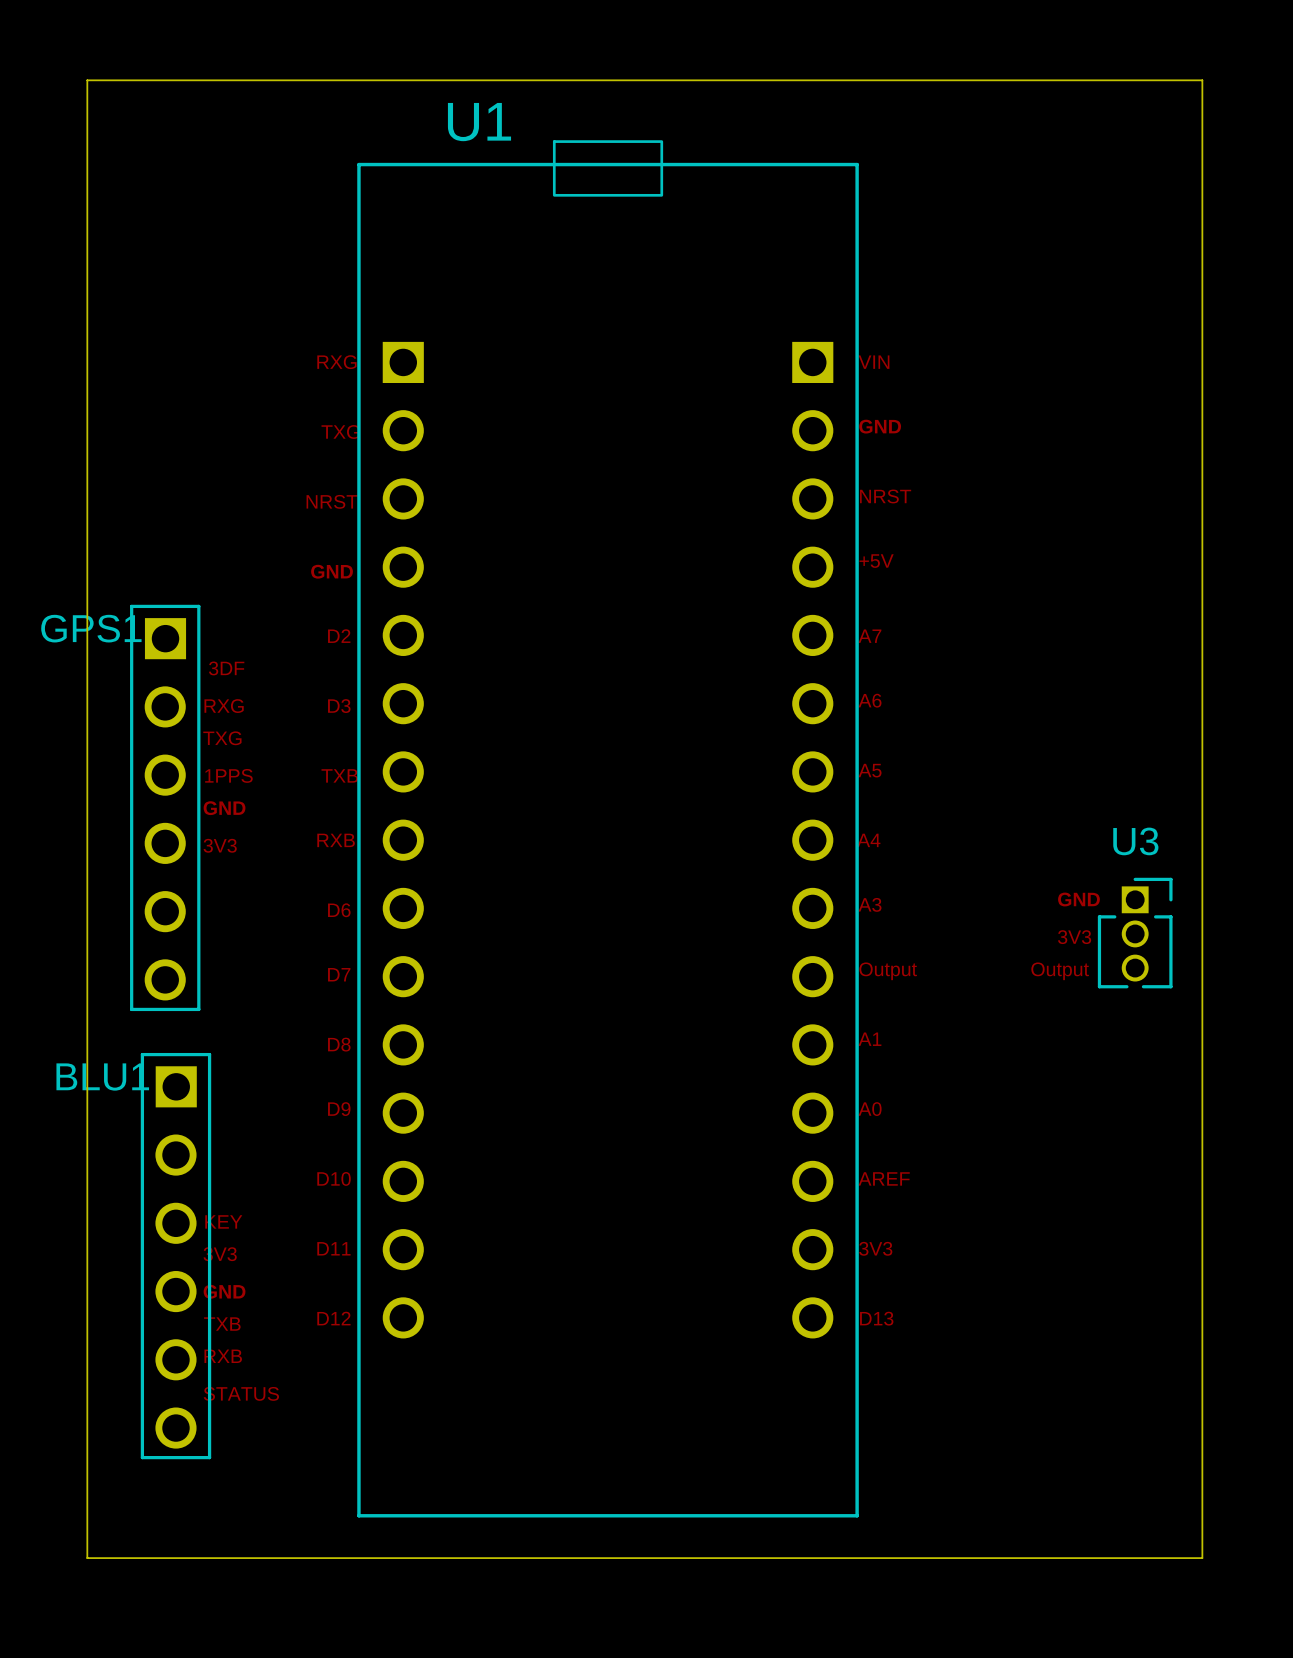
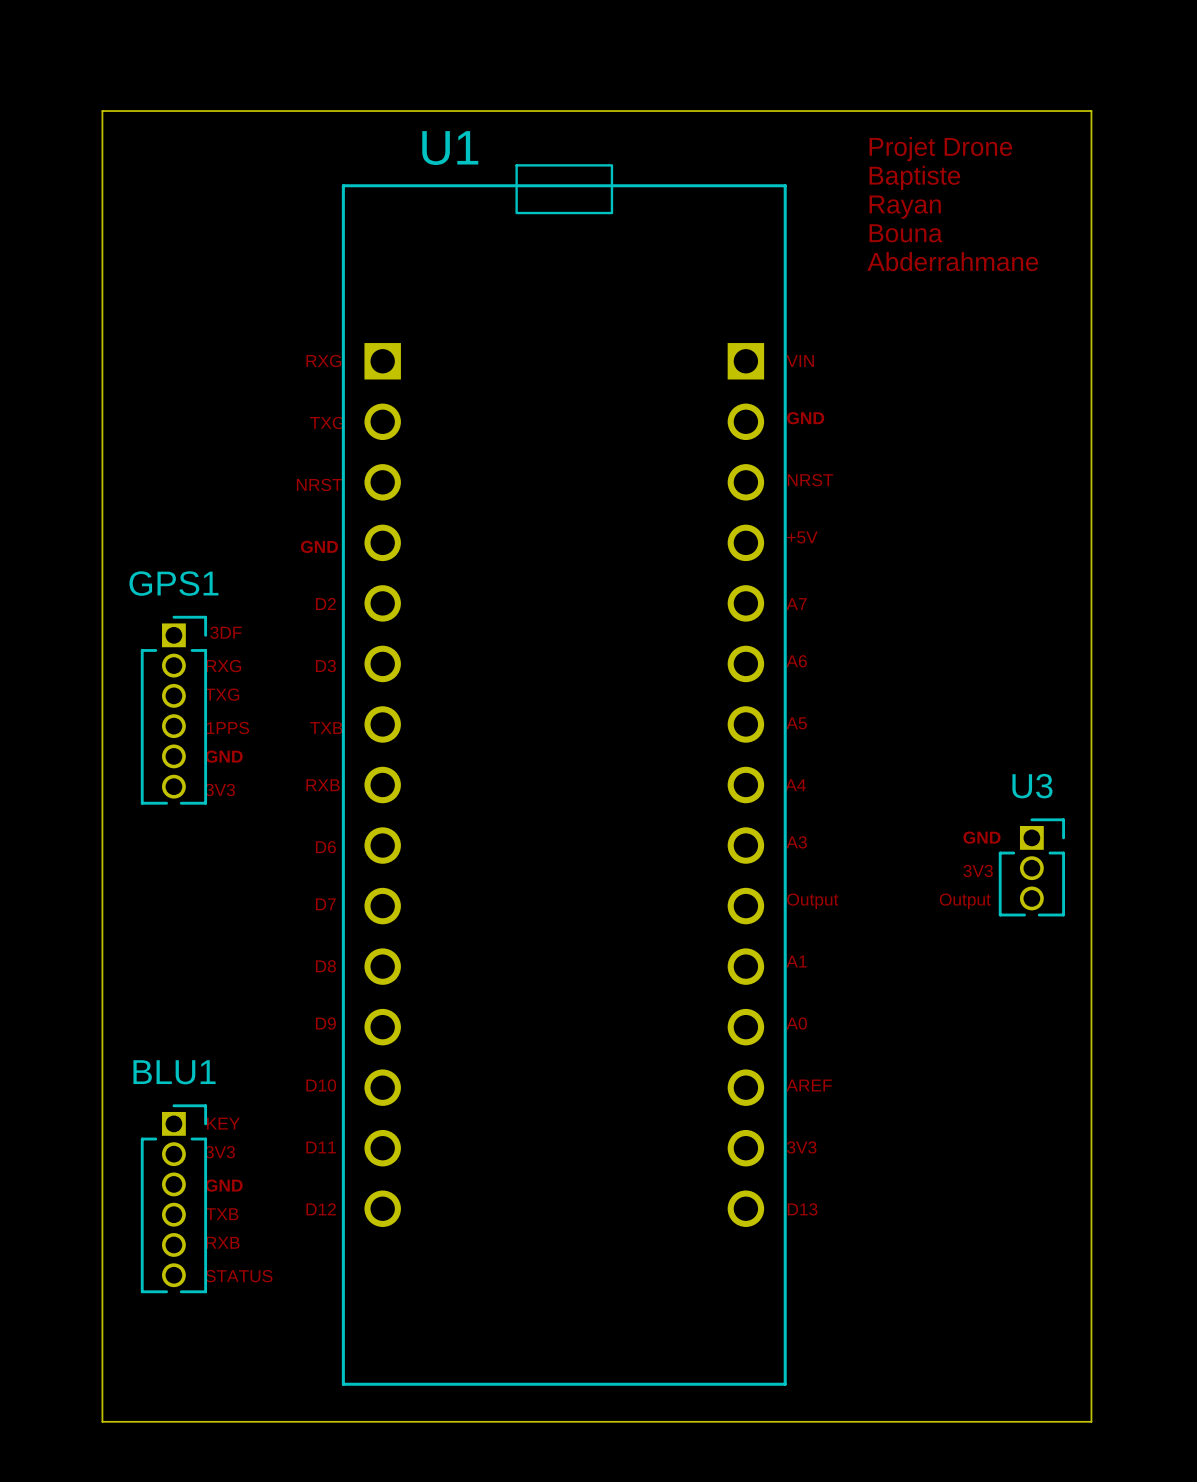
text: none -> Projet Drone (940, 149)
text: none -> Baptiste (914, 177)
text: none -> Rayan (905, 207)
text: none -> Bouna (906, 233)
text: none -> Abderrahmane (952, 261)
GPS1 footprint: [130, 604, 201, 1012] -> [140, 615, 208, 805]
GPS1 name position: GPS1 (91, 628) -> GPS1 (173, 583)
BLU1 footprint: [140, 1052, 212, 1460] -> [140, 1104, 208, 1294]
BLU1 name position: BLU1 (102, 1077) -> BLU1 (174, 1072)

